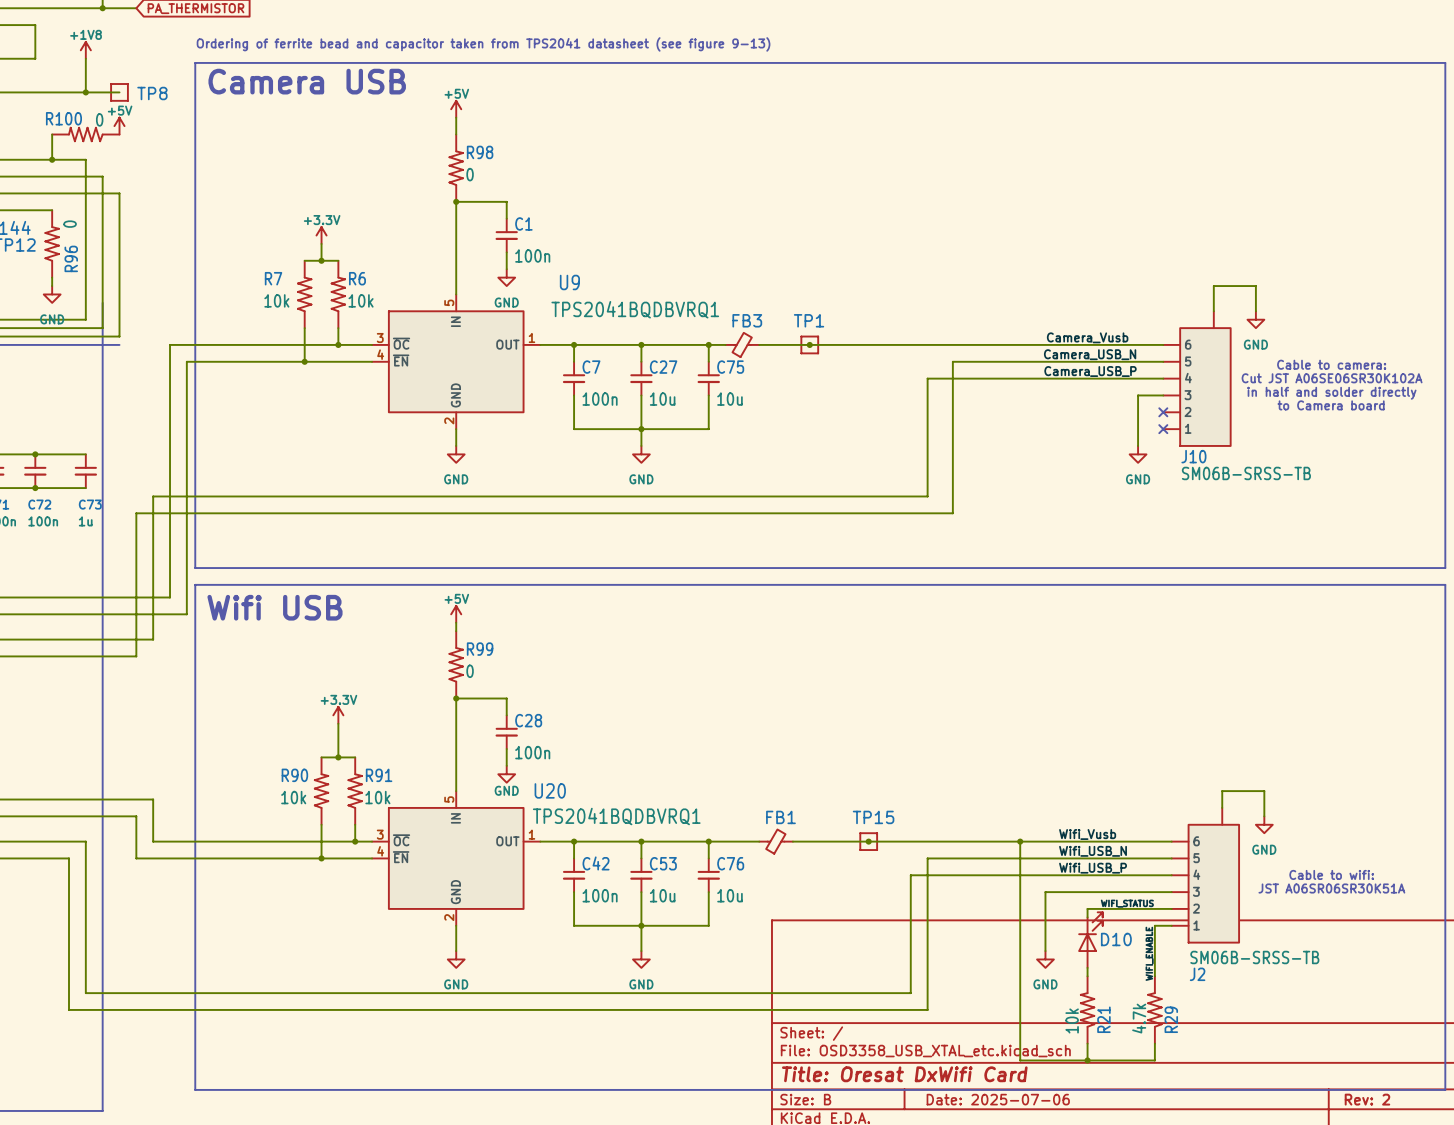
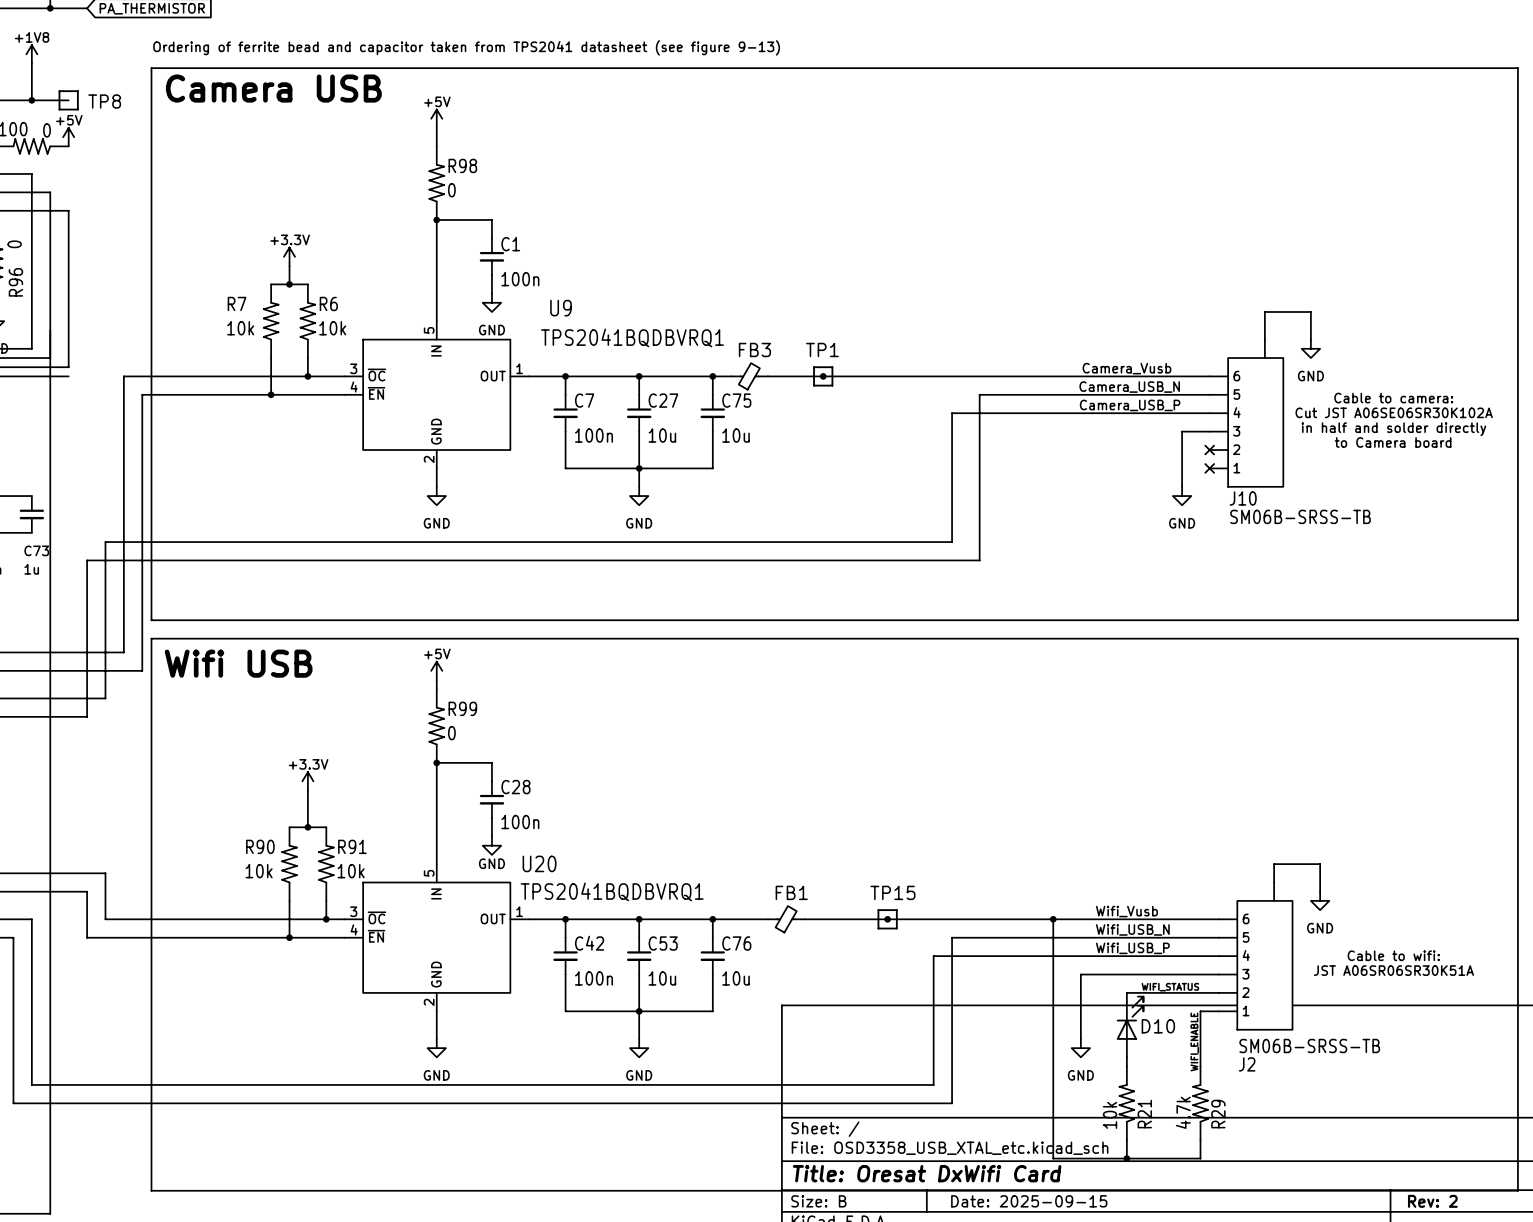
title block: Date: 2025-07-06 (998, 1099) -> Date: 2025-09-15 (1029, 1201)

